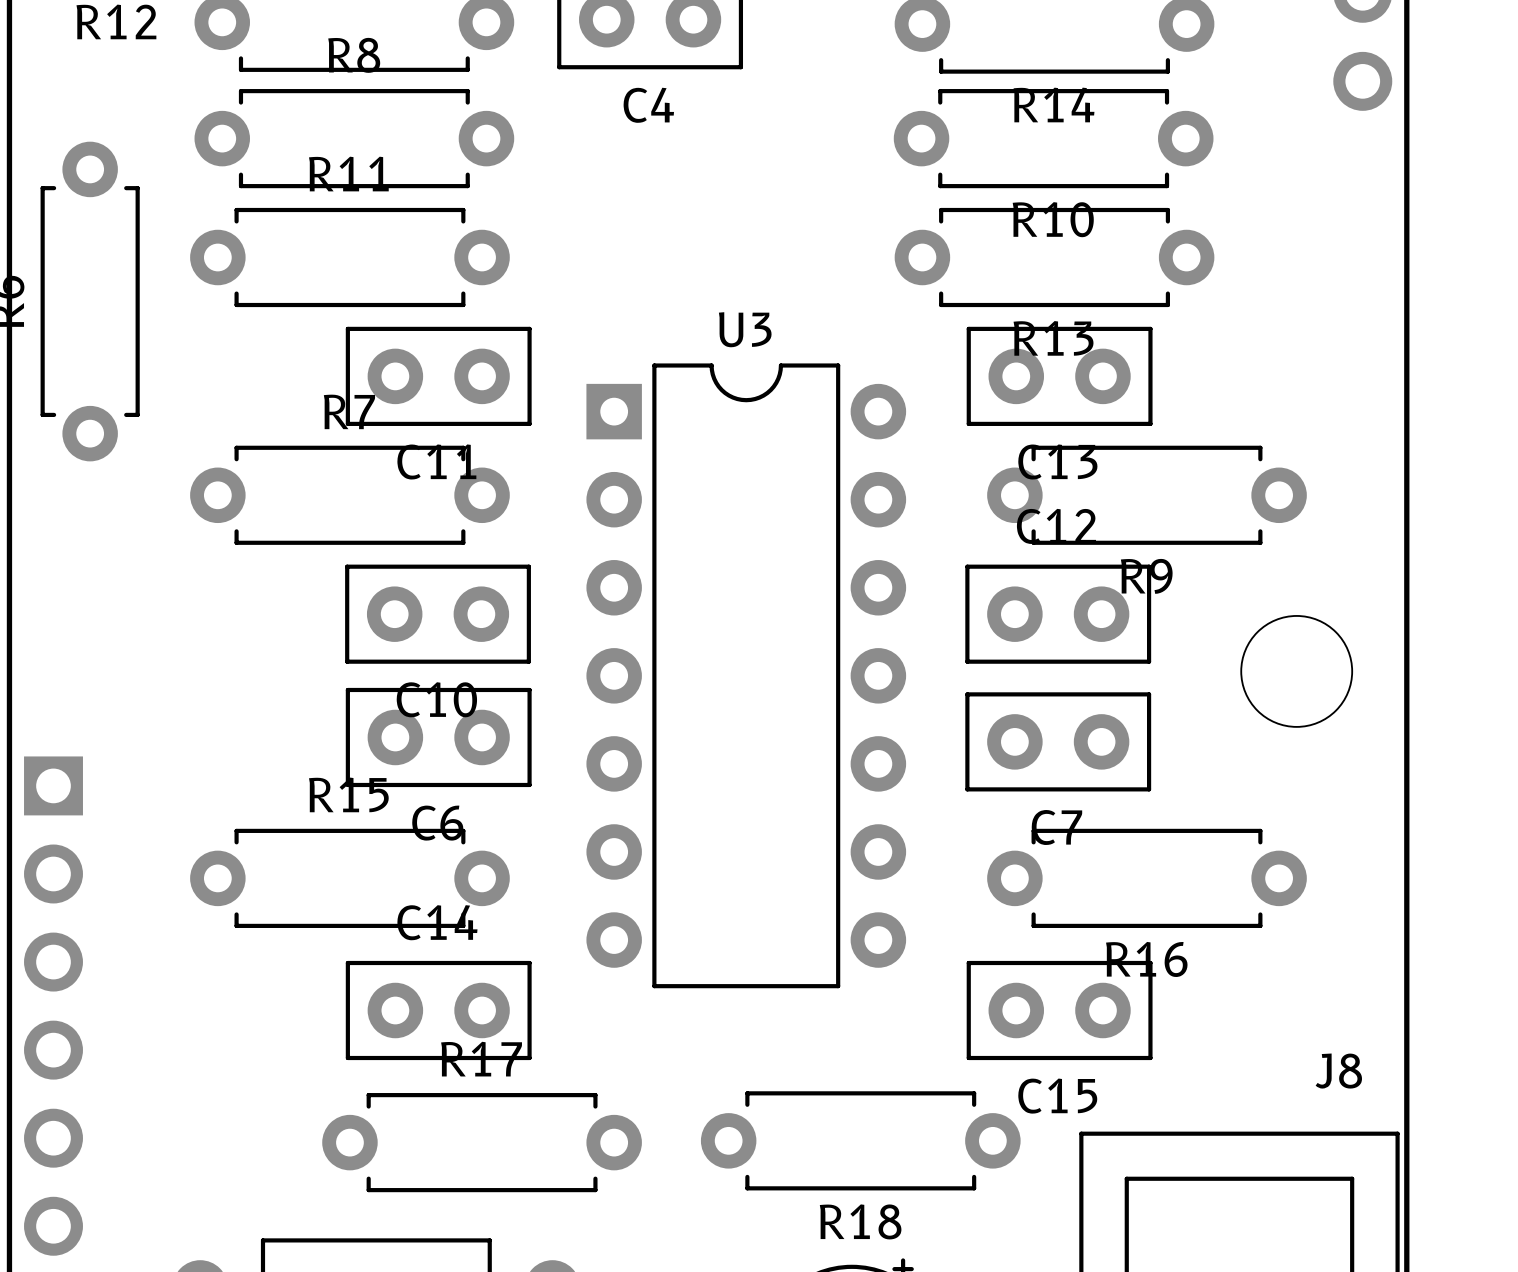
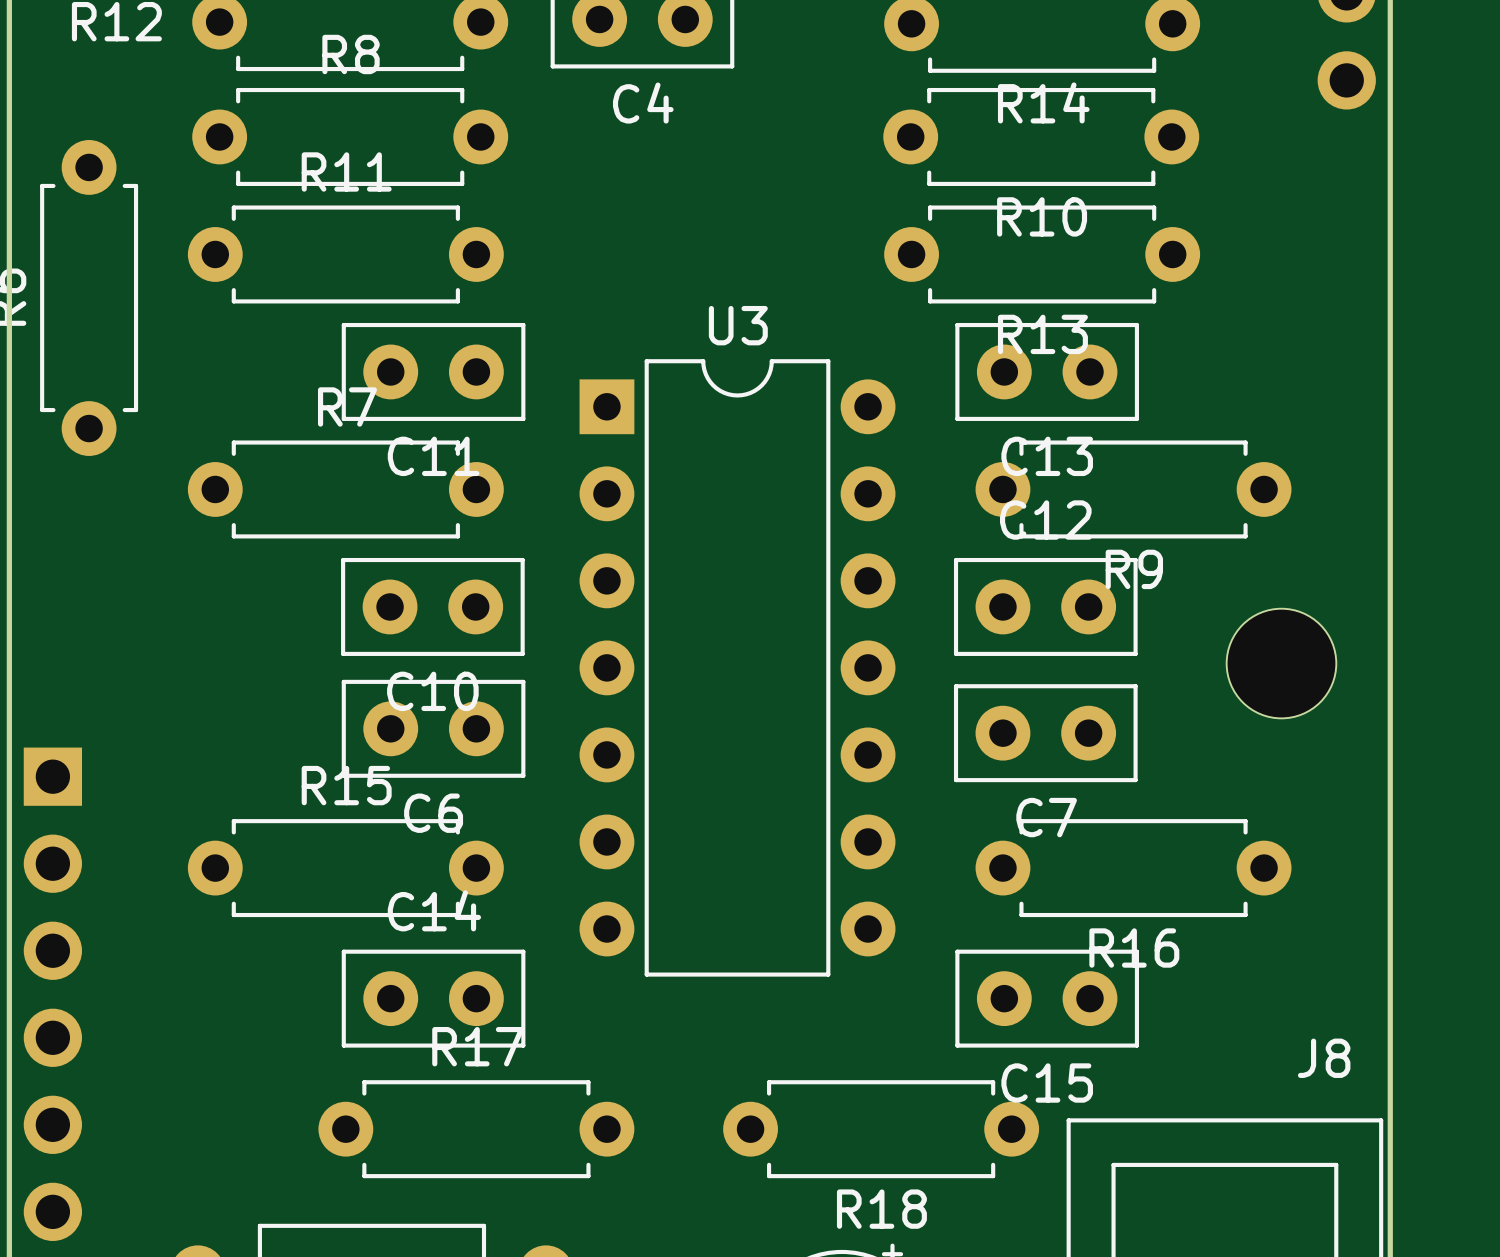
R18 position: (860, 1140) -> (881, 1129)

